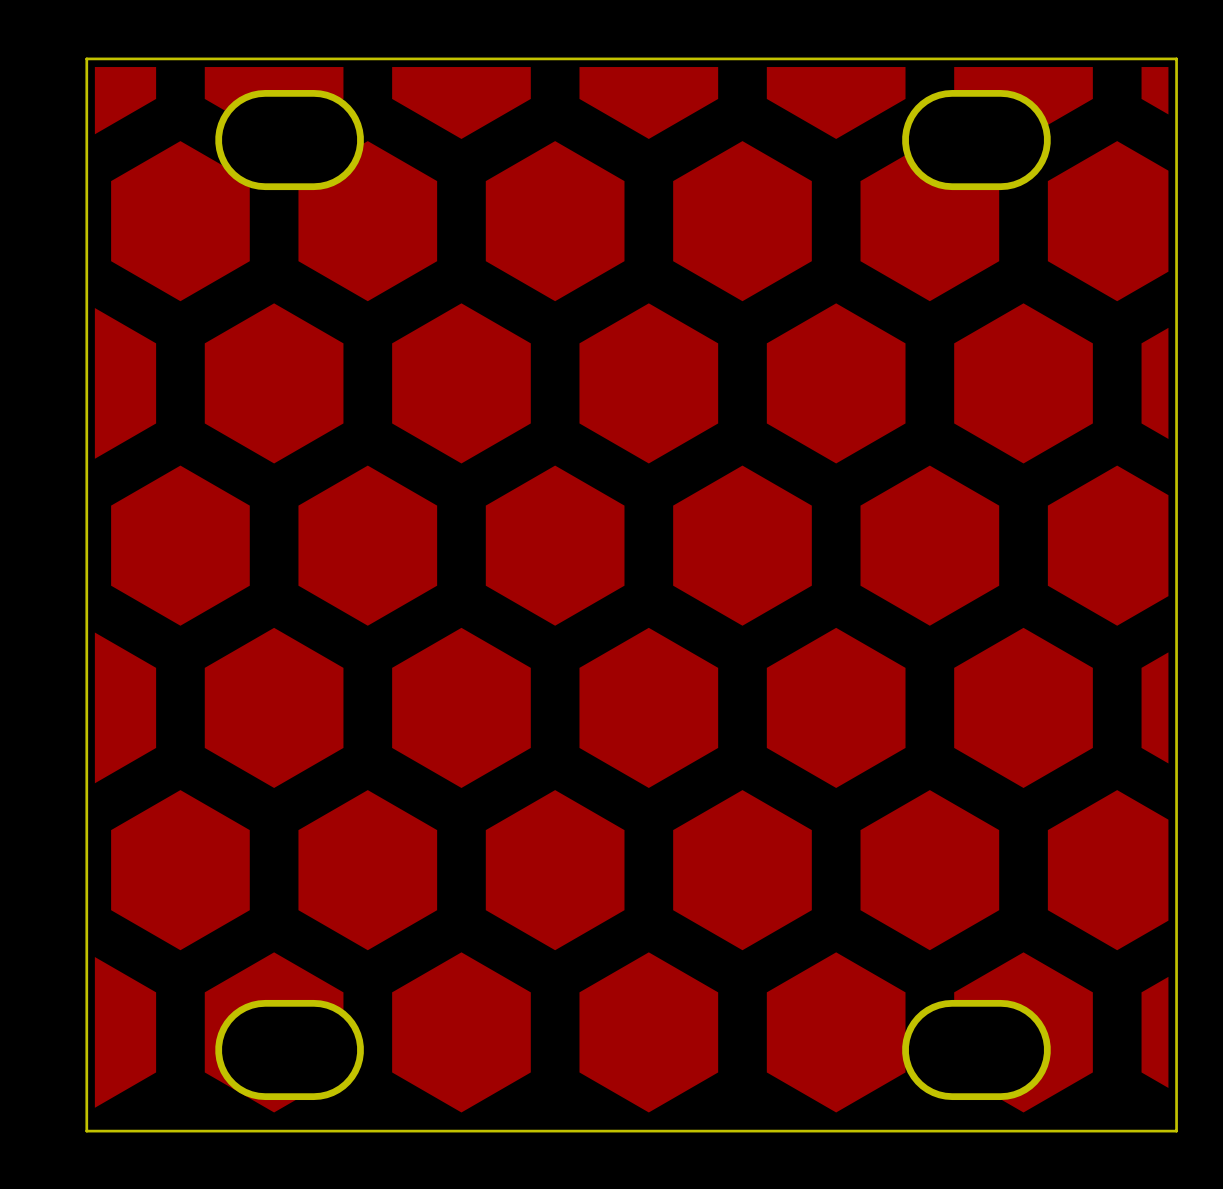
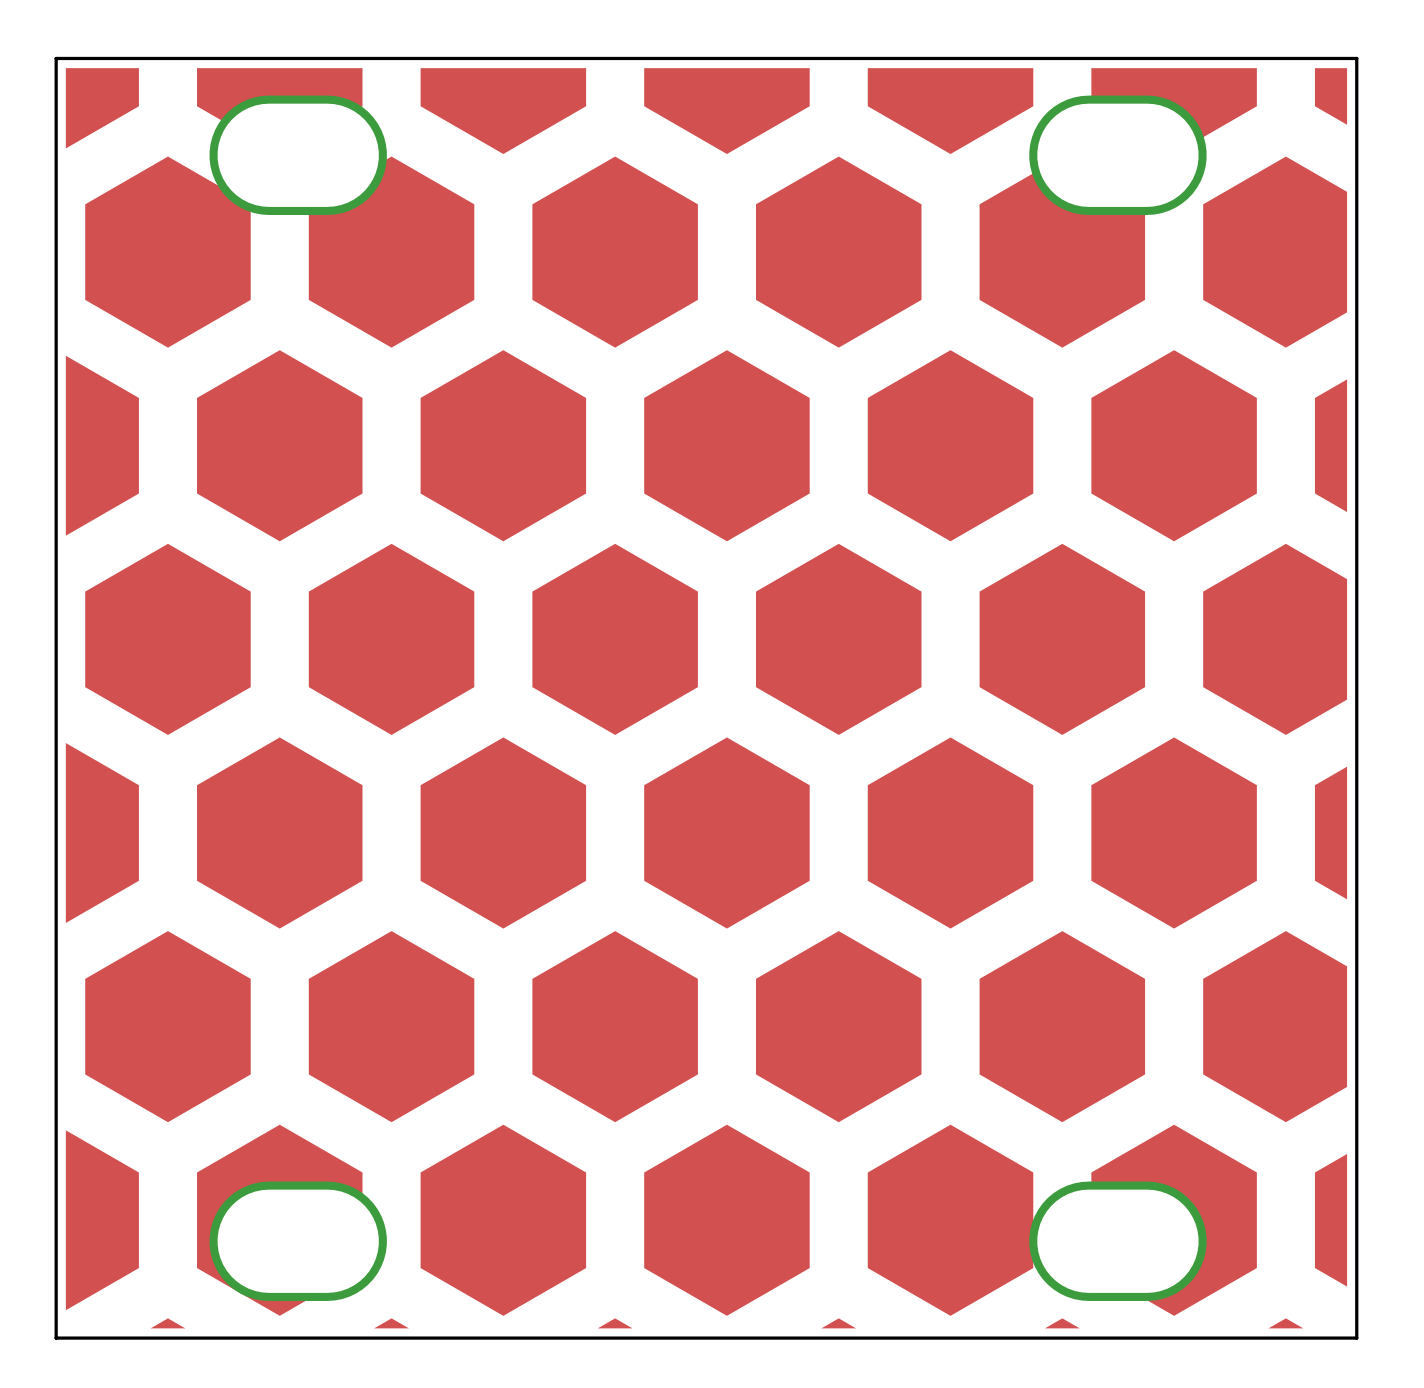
drawing: none -> [150, 1318, 186, 1329]
drawing: none -> [374, 1318, 409, 1329]
drawing: none -> [597, 1318, 633, 1329]
drawing: none -> [821, 1318, 857, 1329]
drawing: none -> [1044, 1318, 1080, 1329]
drawing: none -> [1268, 1318, 1304, 1329]

